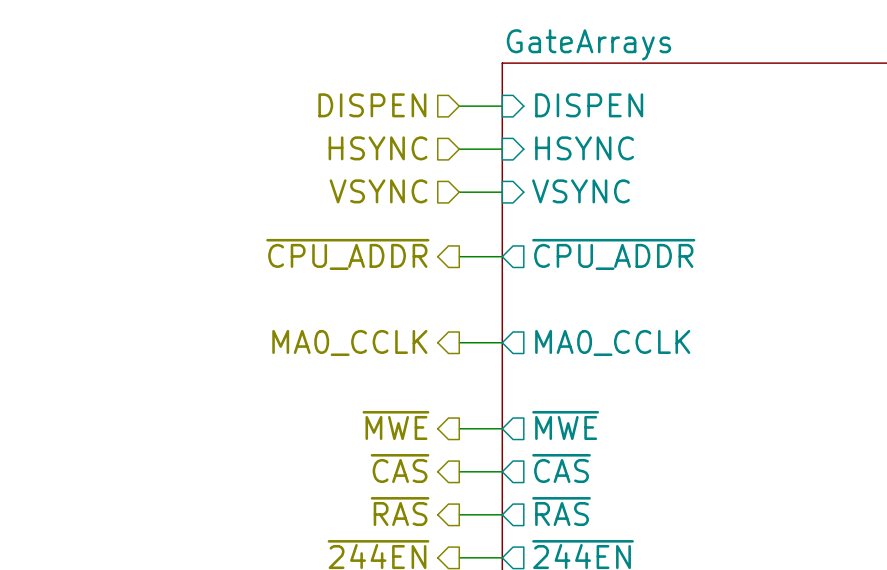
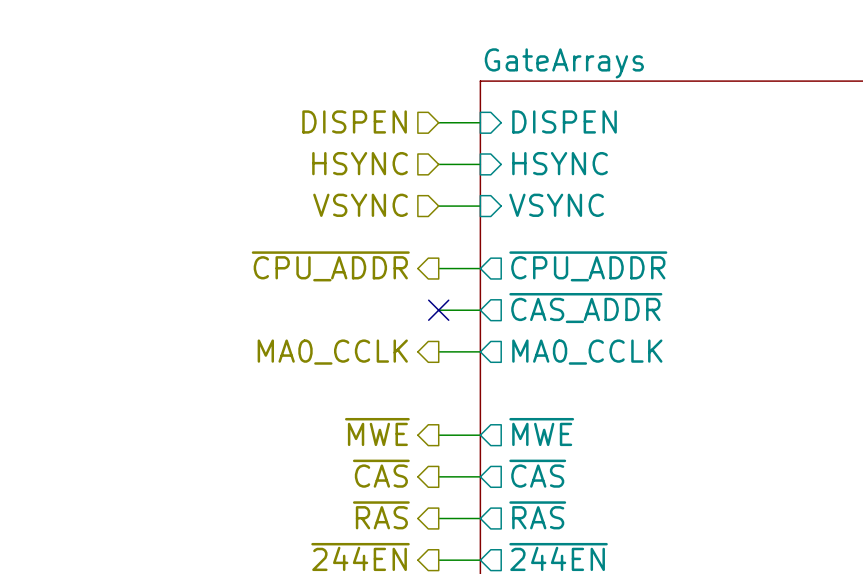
sheet pin: none -> ~{CAS_ADDR} (585, 308)
wire: none -> (438, 310) (480, 310)
no-connect mark: none -> (438, 310)

